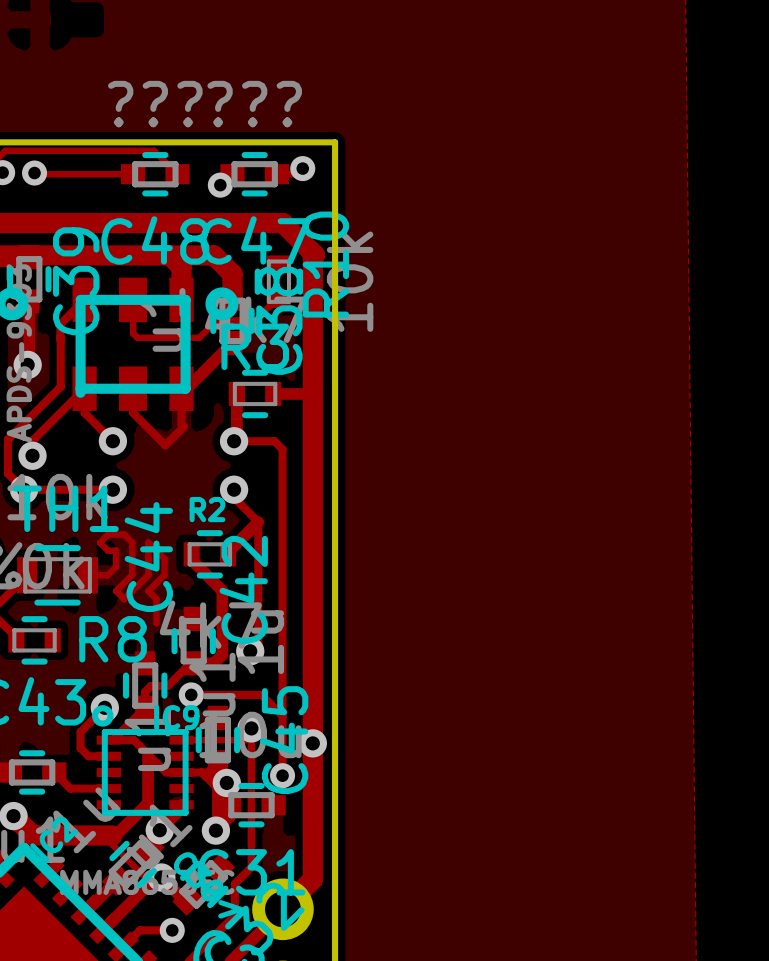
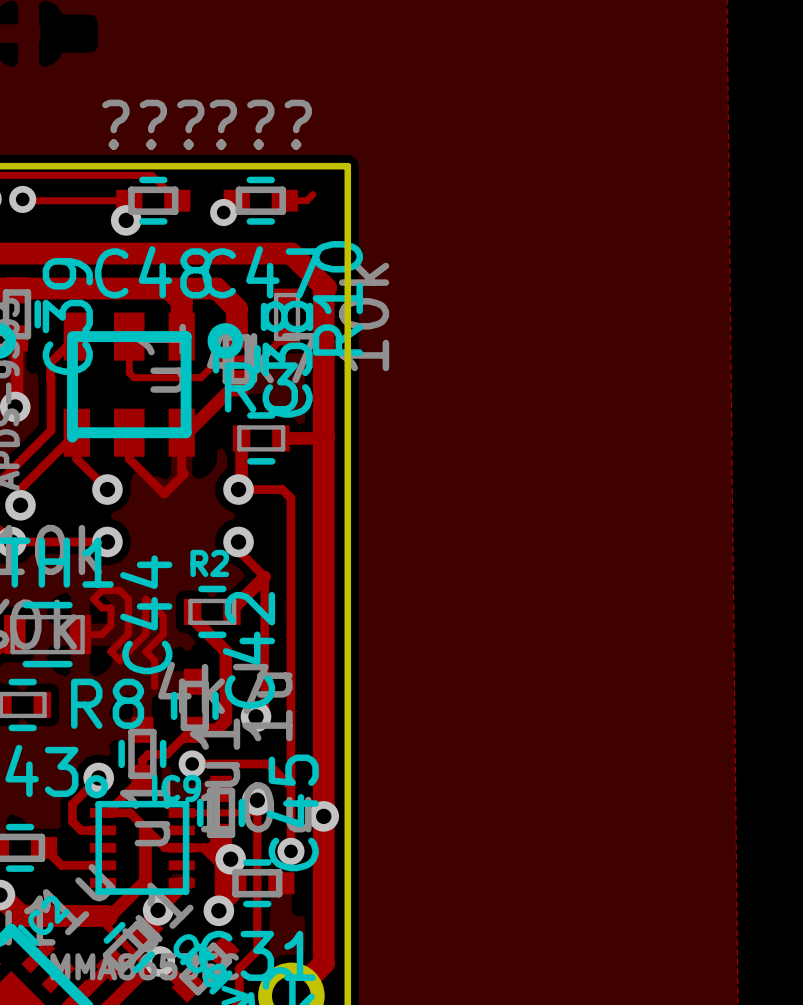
via: (302, 168) -> none
via: none -> (126, 220)

